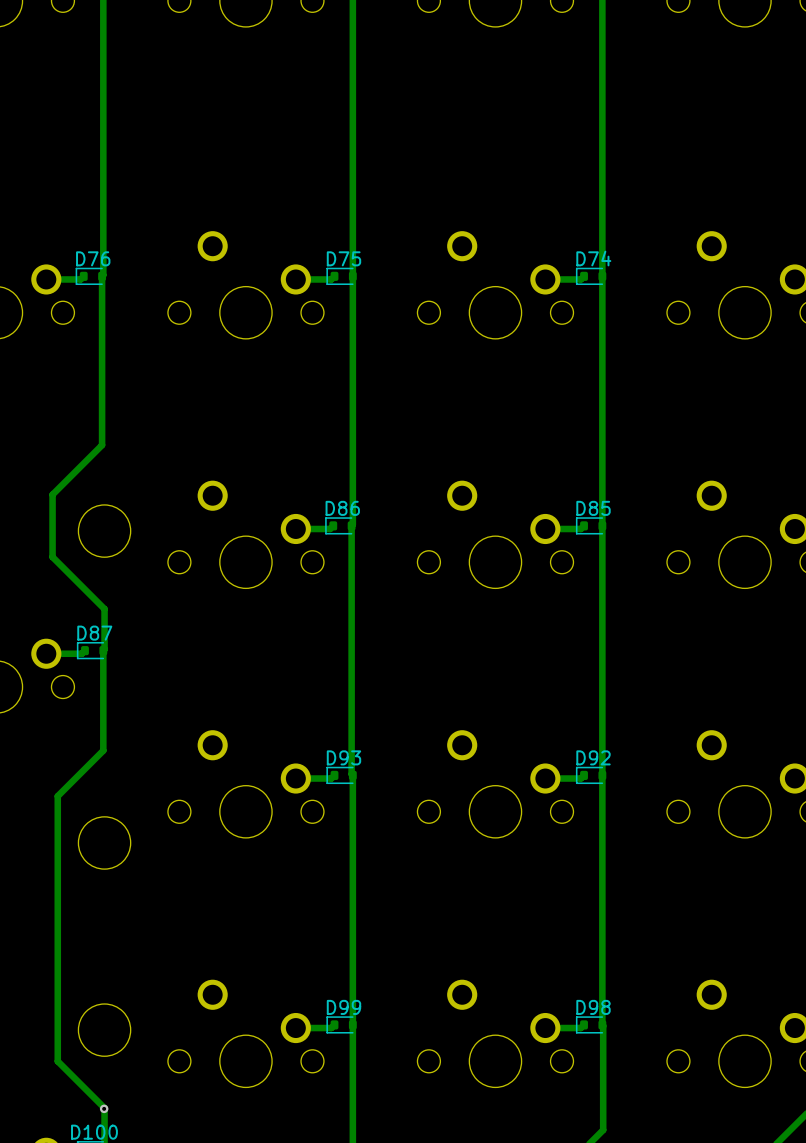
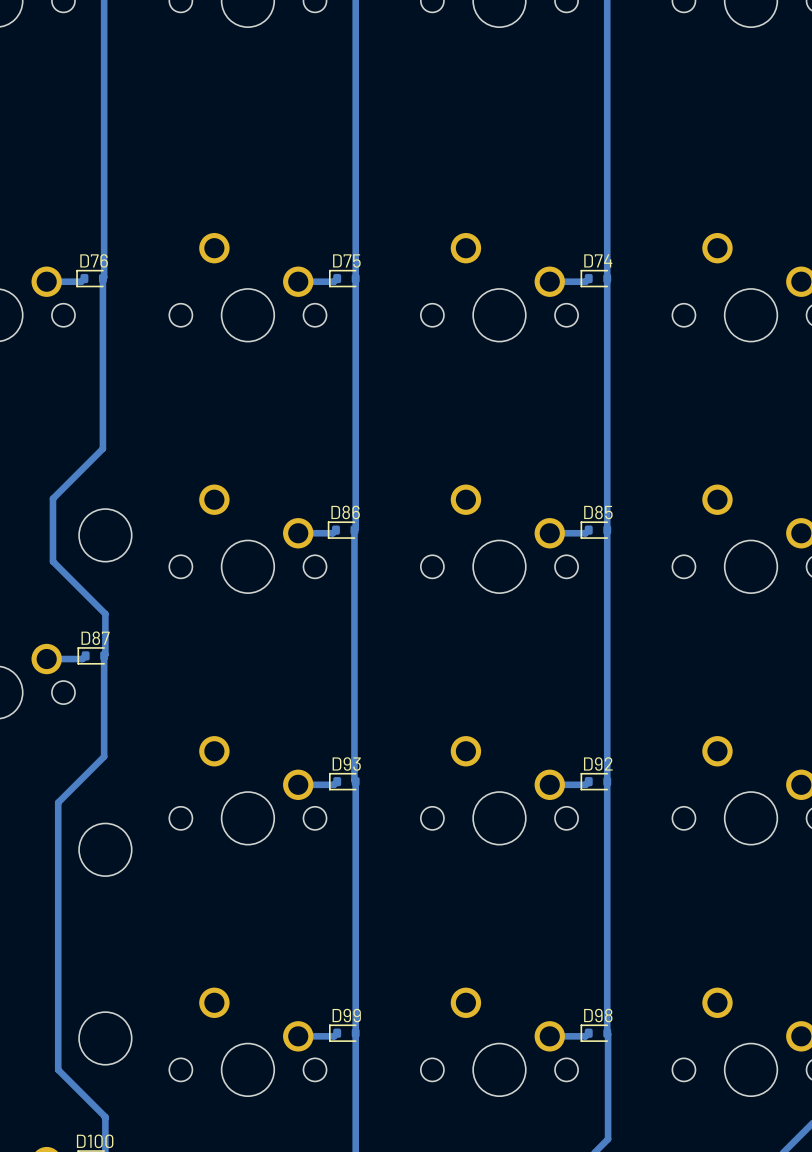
via: (104, 1108) -> none

